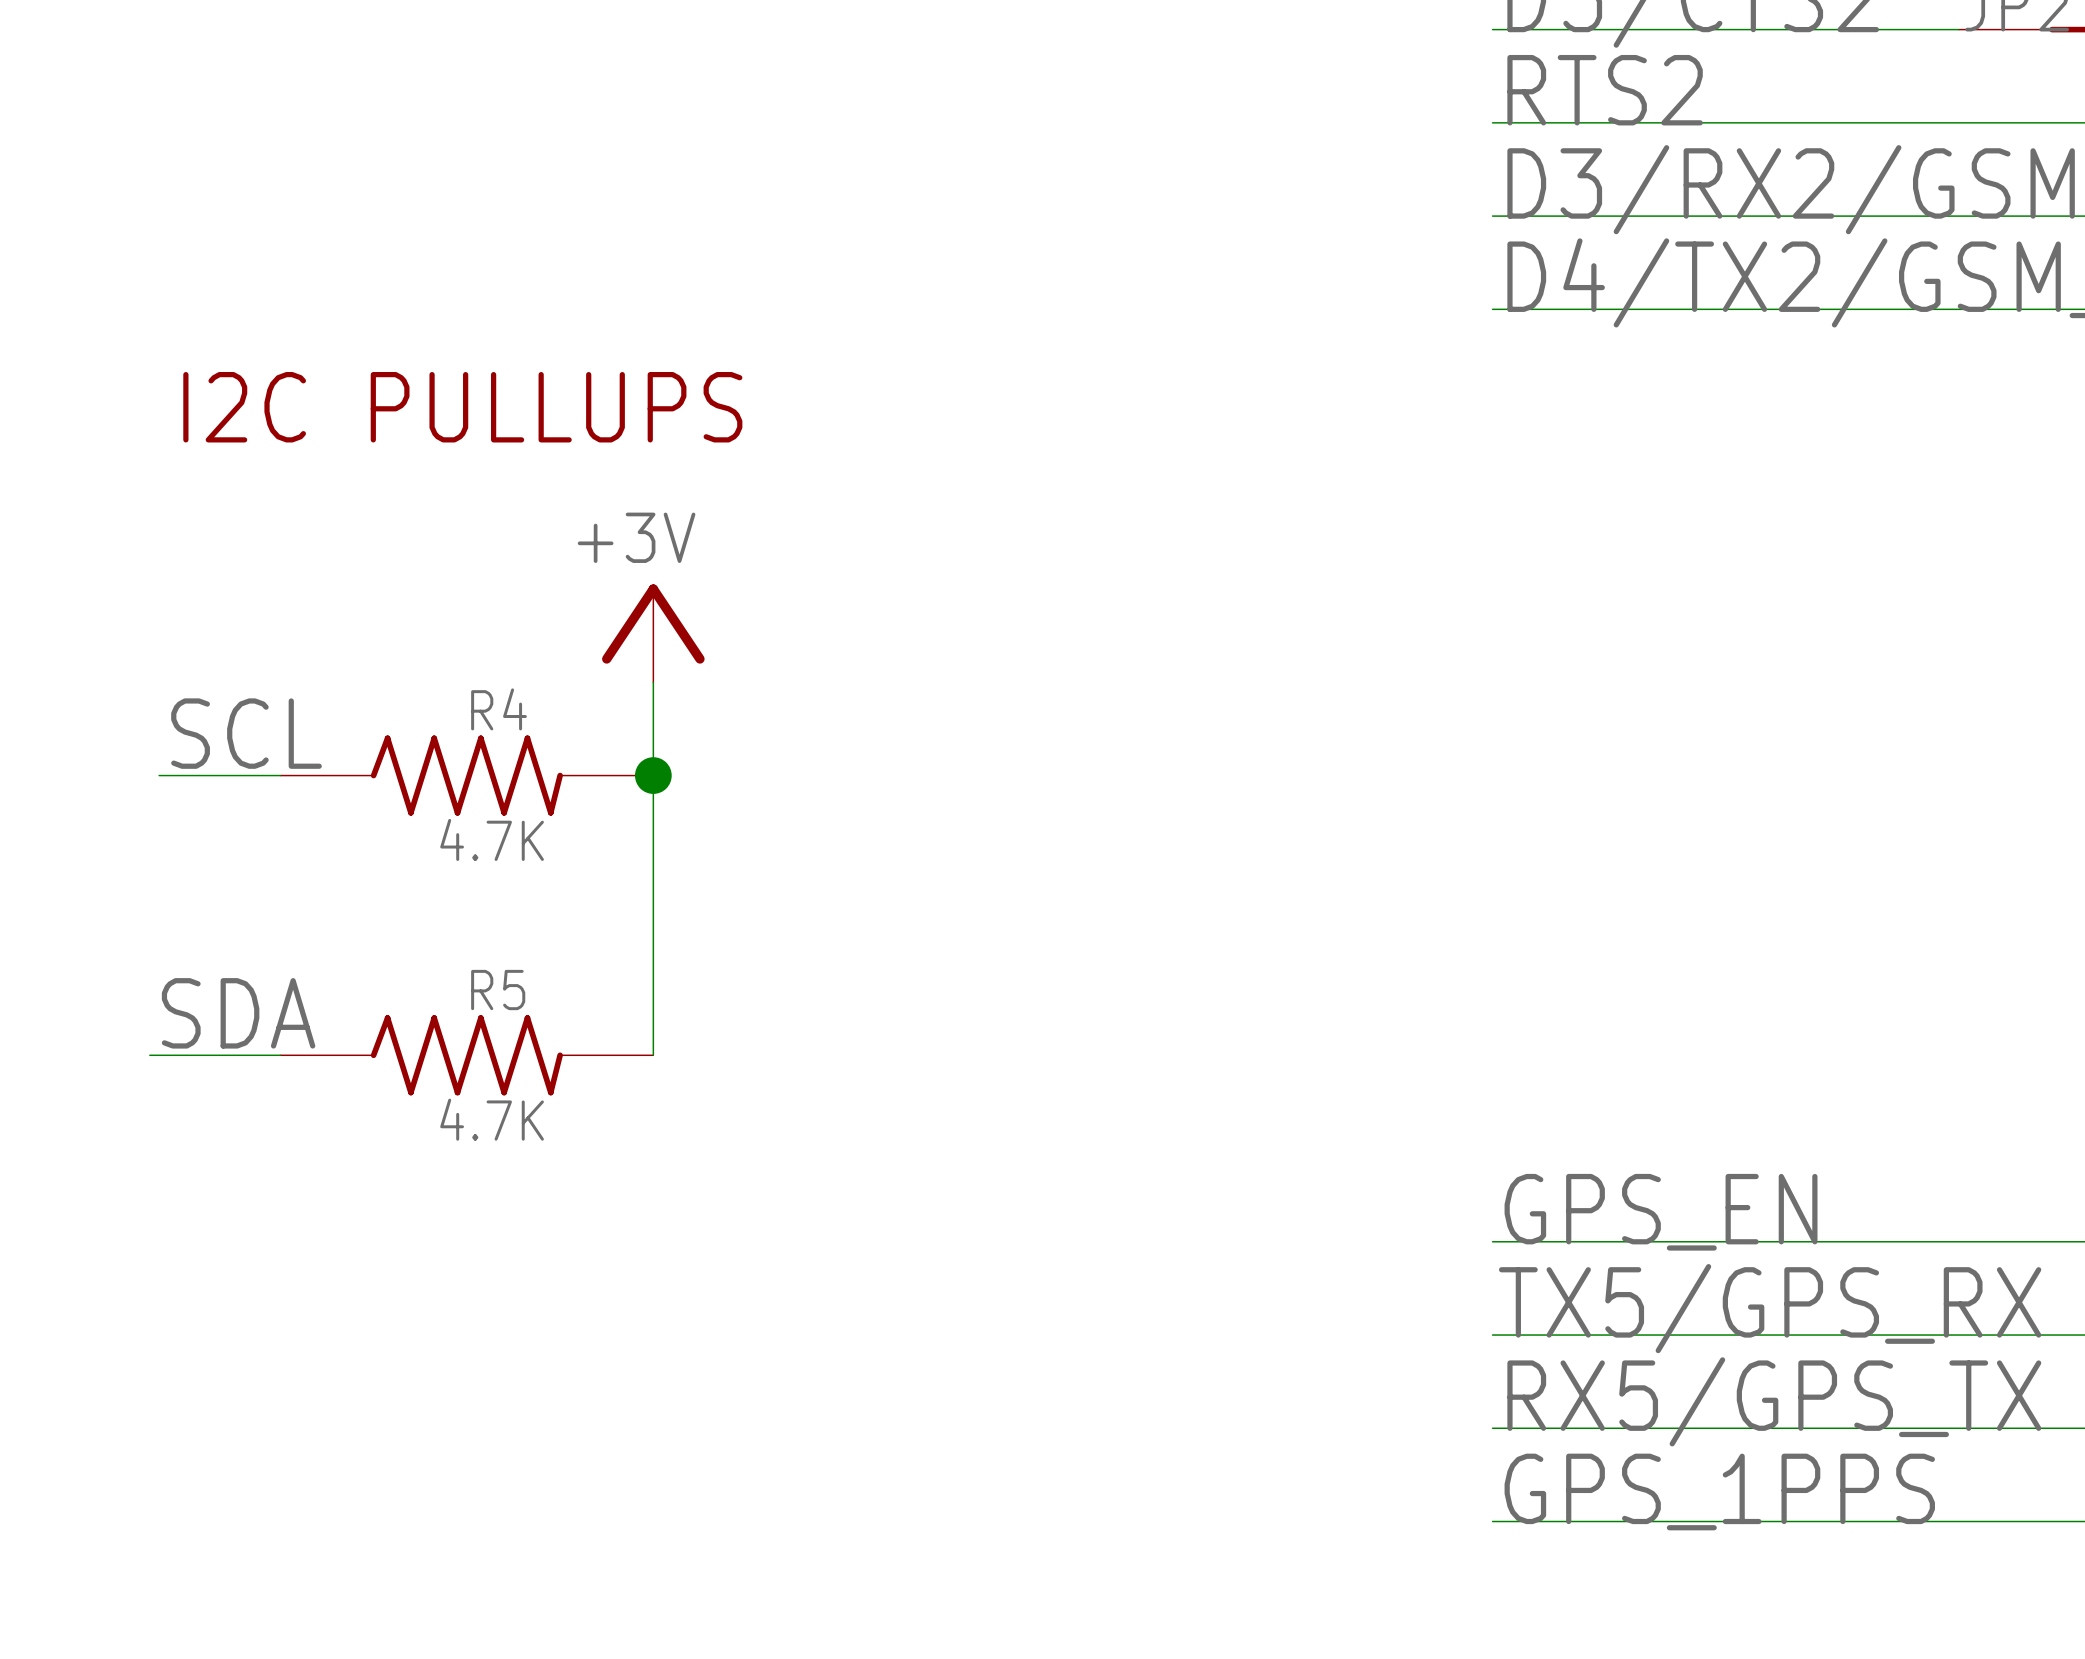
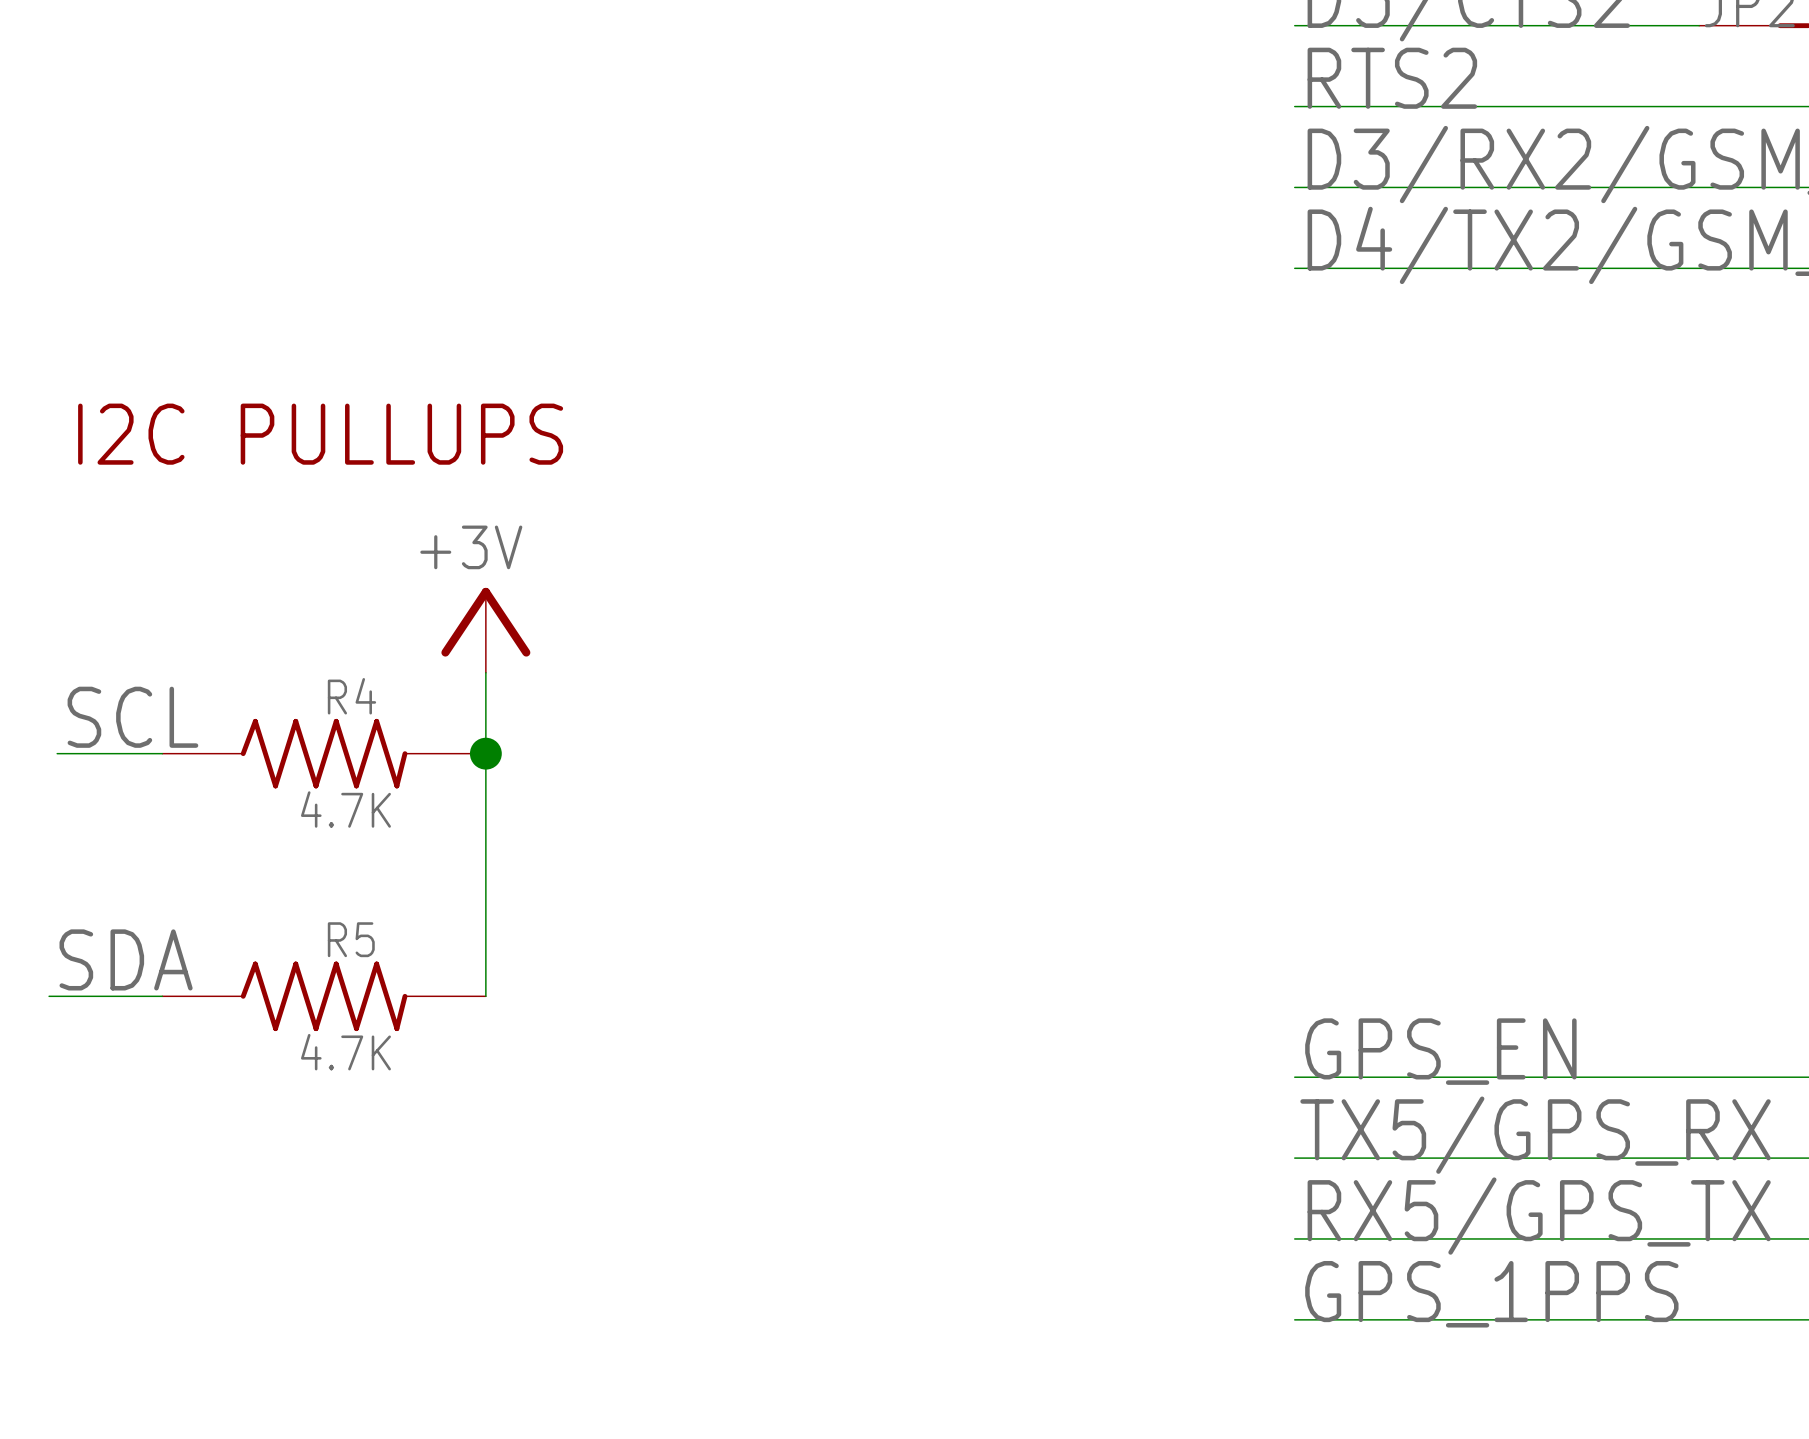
text position: I2C PULLUPS (462, 407) -> I2C PULLUPS (320, 434)
power symbol position: +3V (653, 633) -> +3V (485, 630)
wire: (653, 682) (653, 1055) -> (485, 672) (485, 996)
label position: SCL (246, 733) -> SCL (132, 717)
wire: (159, 775) (280, 775) -> (57, 753) (162, 753)
R4 position: (466, 775) -> (324, 753)
junction position: (653, 775) -> (485, 753)
label position: SDA (238, 1013) -> SDA (126, 959)
wire: (149, 1055) (280, 1055) -> (49, 996) (162, 996)
R5 position: (466, 1055) -> (324, 996)

